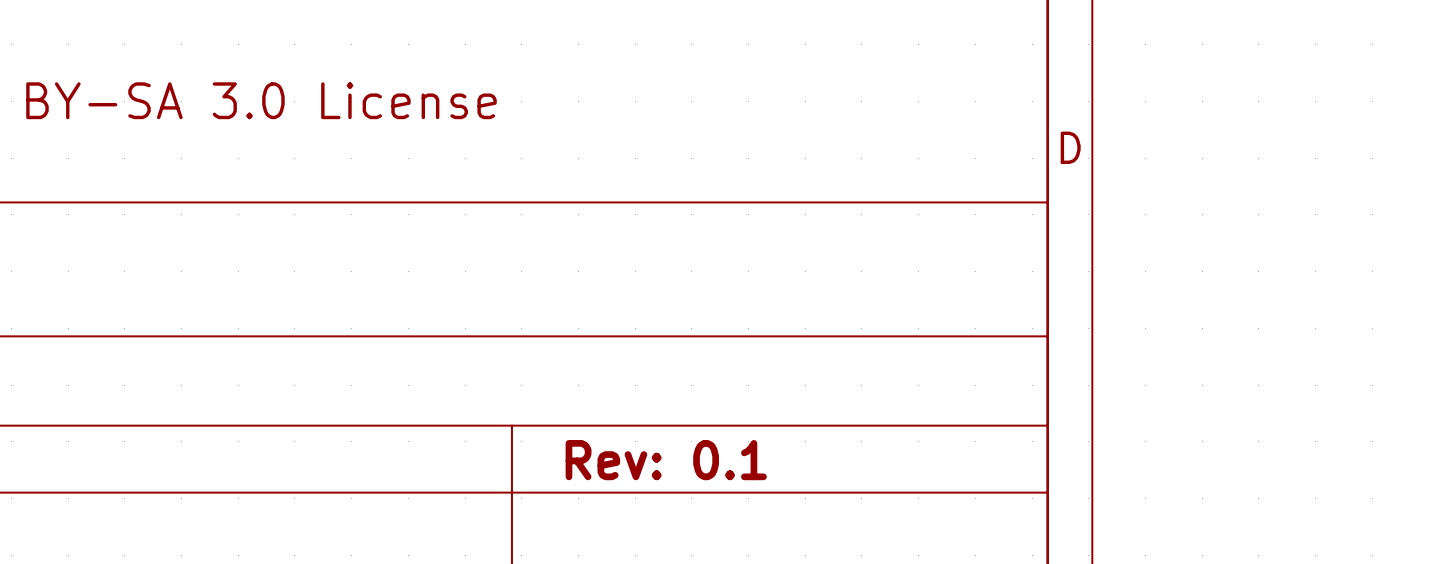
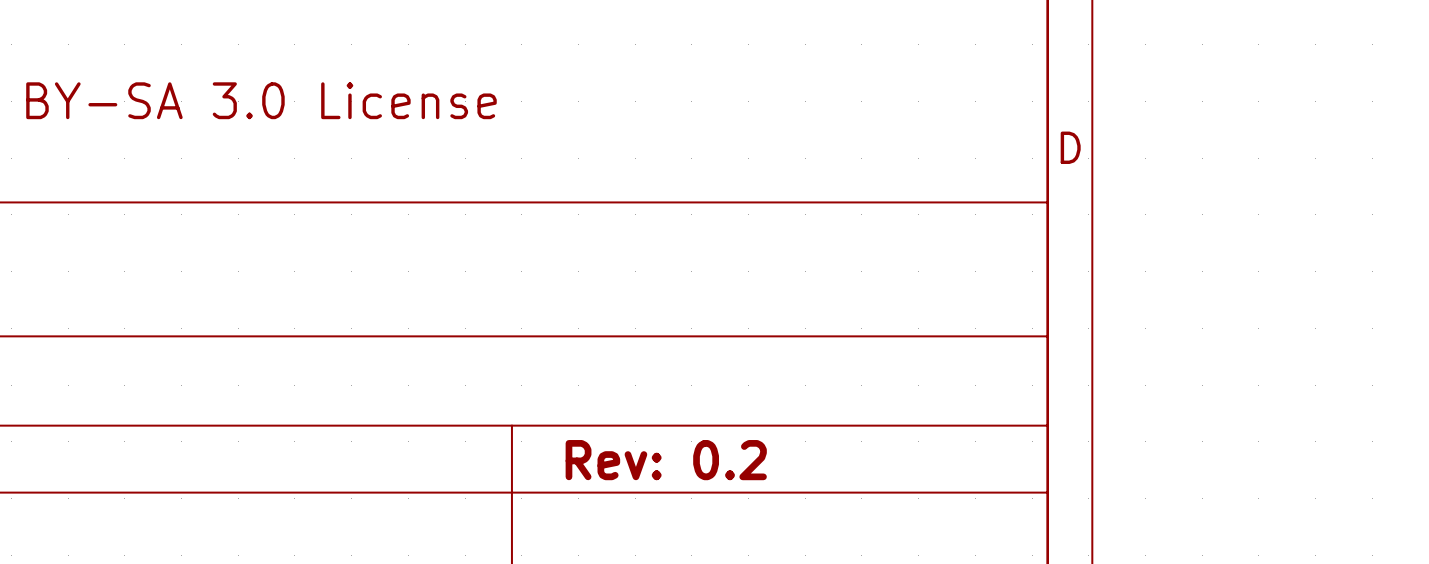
title block: Rev: 0.1 (666, 460) -> Rev: 0.2 (666, 460)

